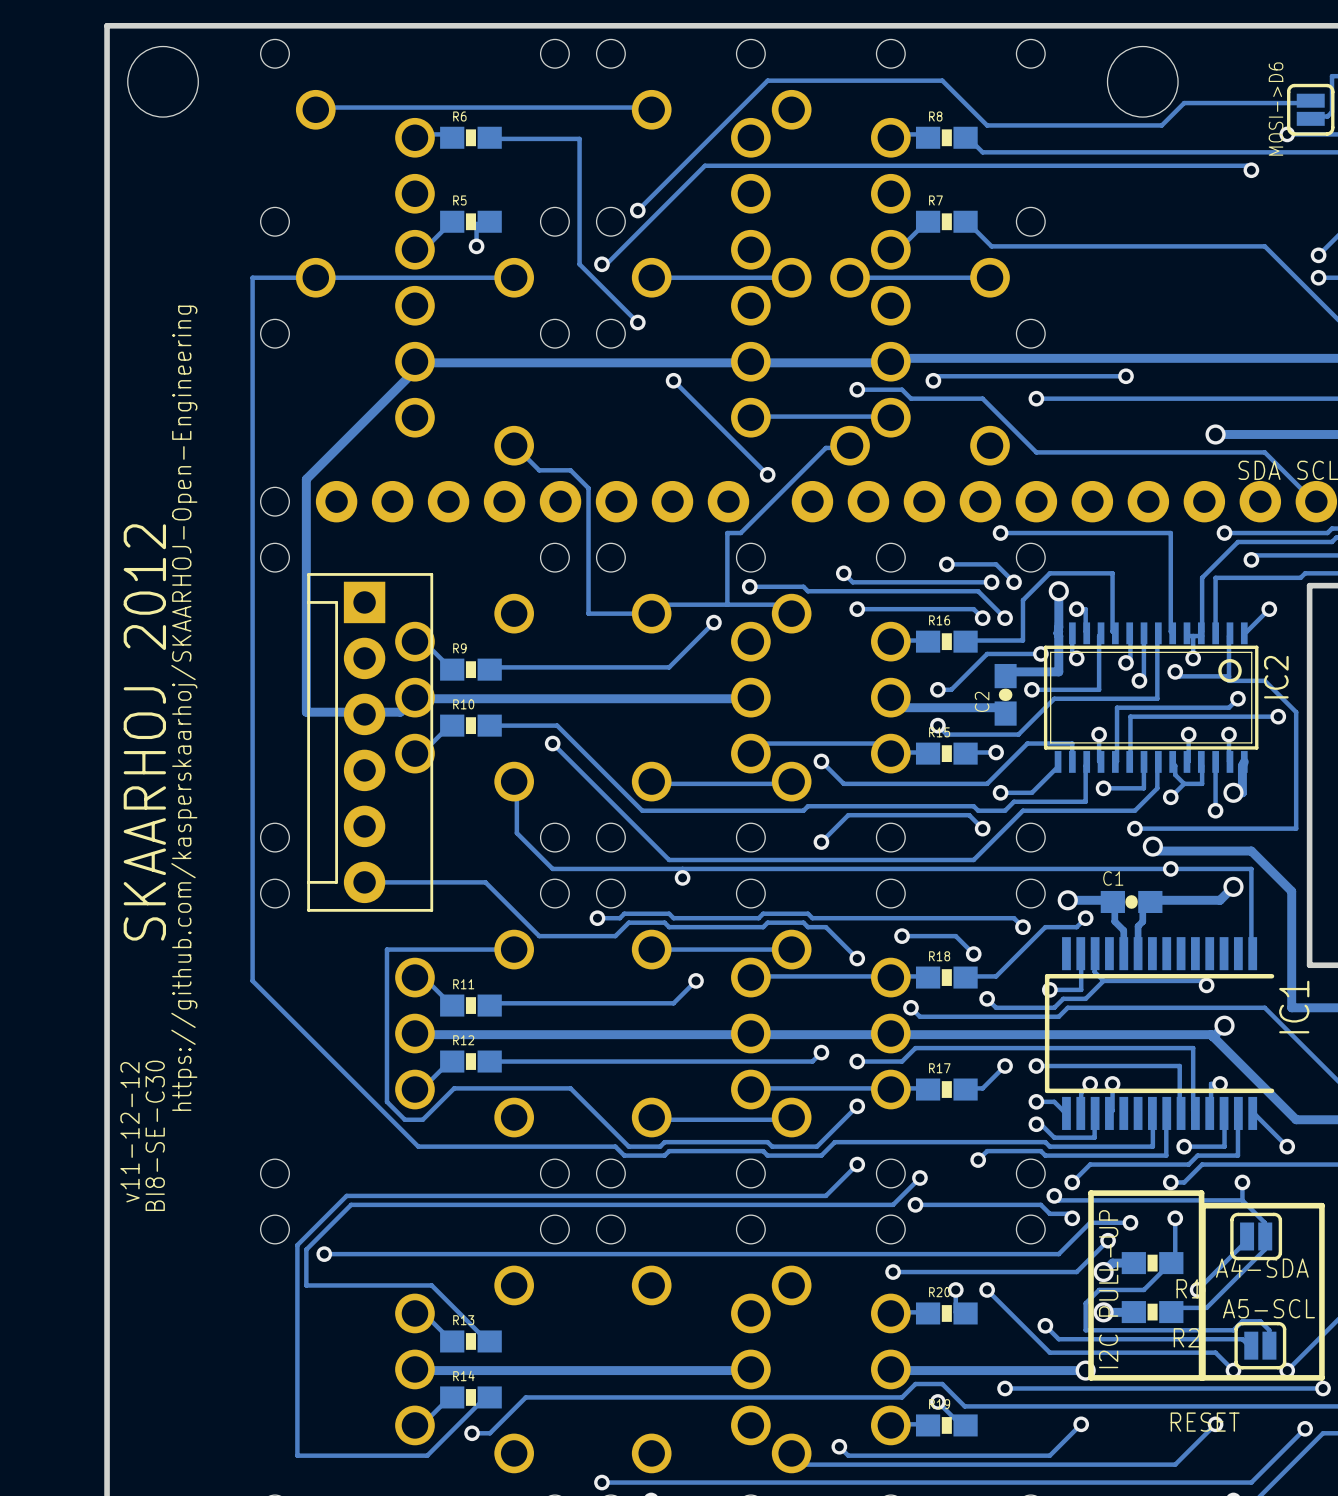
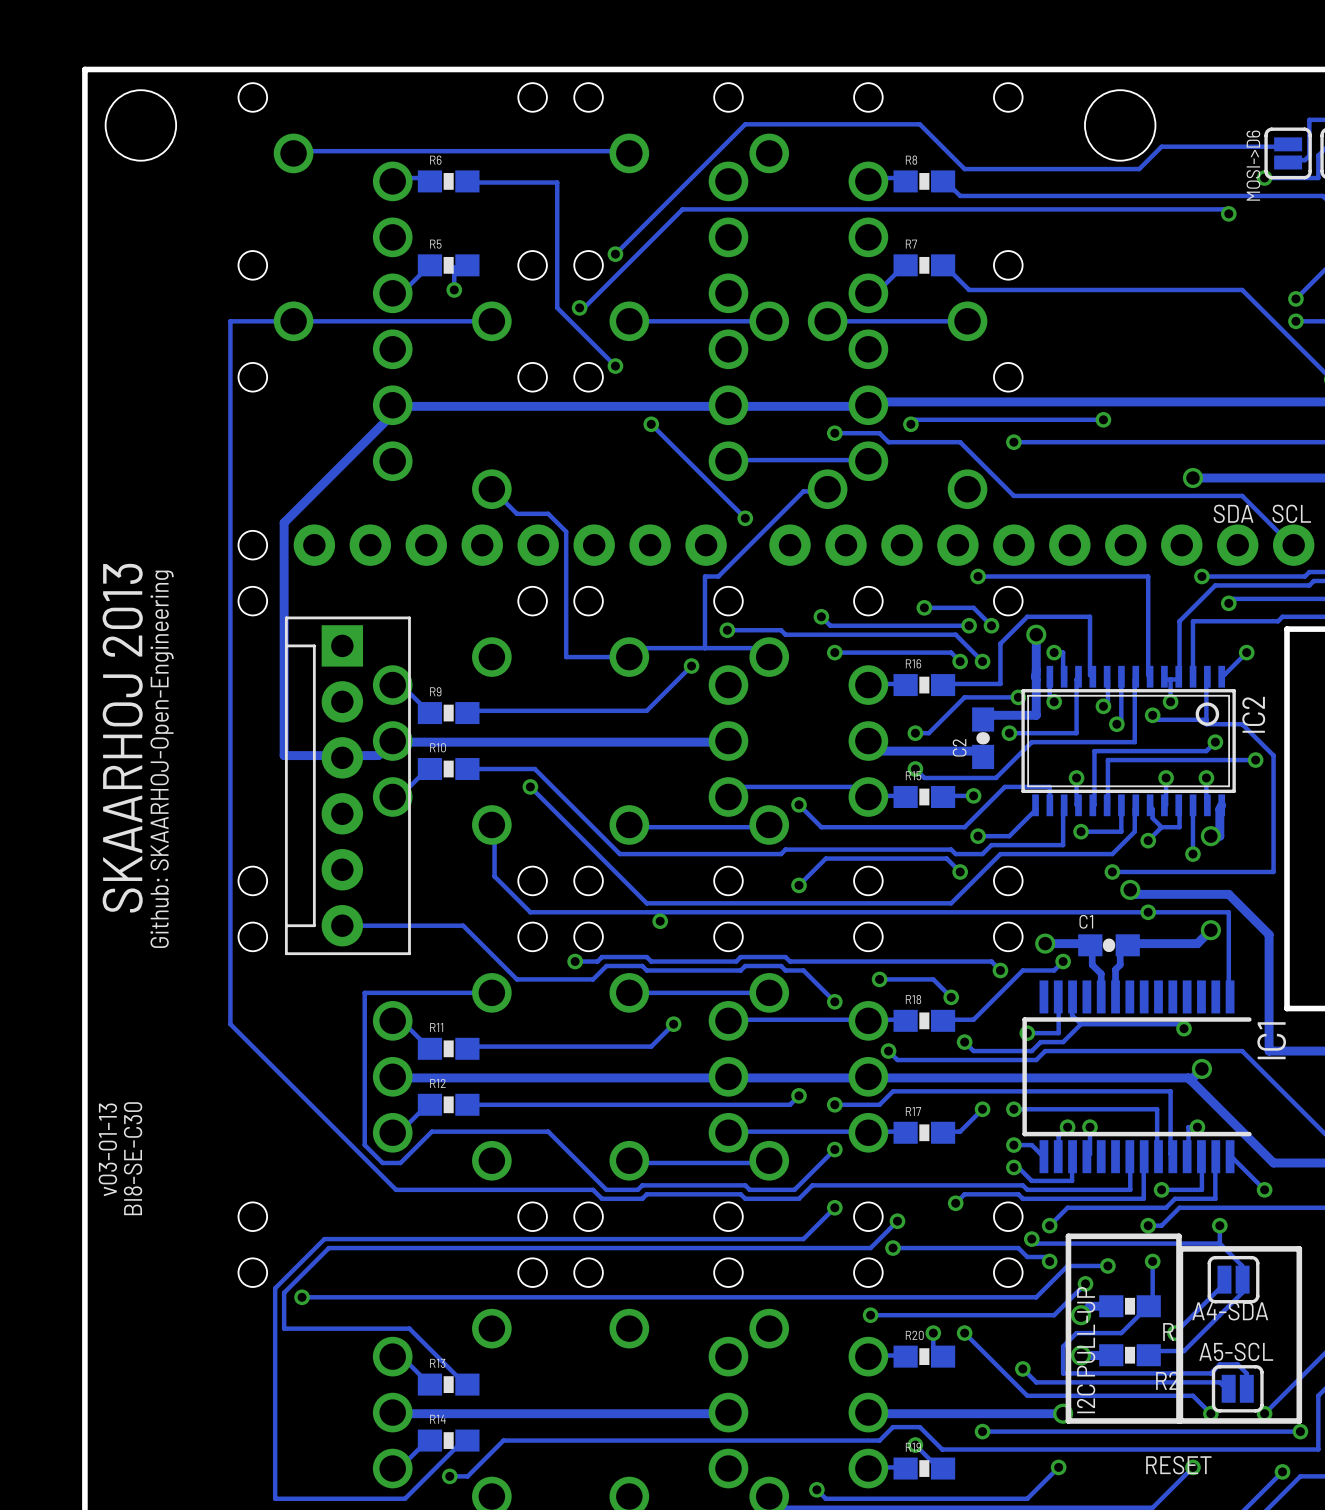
text: https://github.com/kasperskaarhoj/SKAARHOJ-Open-Engineering (184, 708) -> Github: SKAARHOJ-Open-Engineering (162, 759)
text: SKAARHOJ 2012 (144, 732) -> SKAARHOJ 2013 (122, 738)
text: v11-12-12 (130, 1132) -> v03-01-13 (107, 1149)

